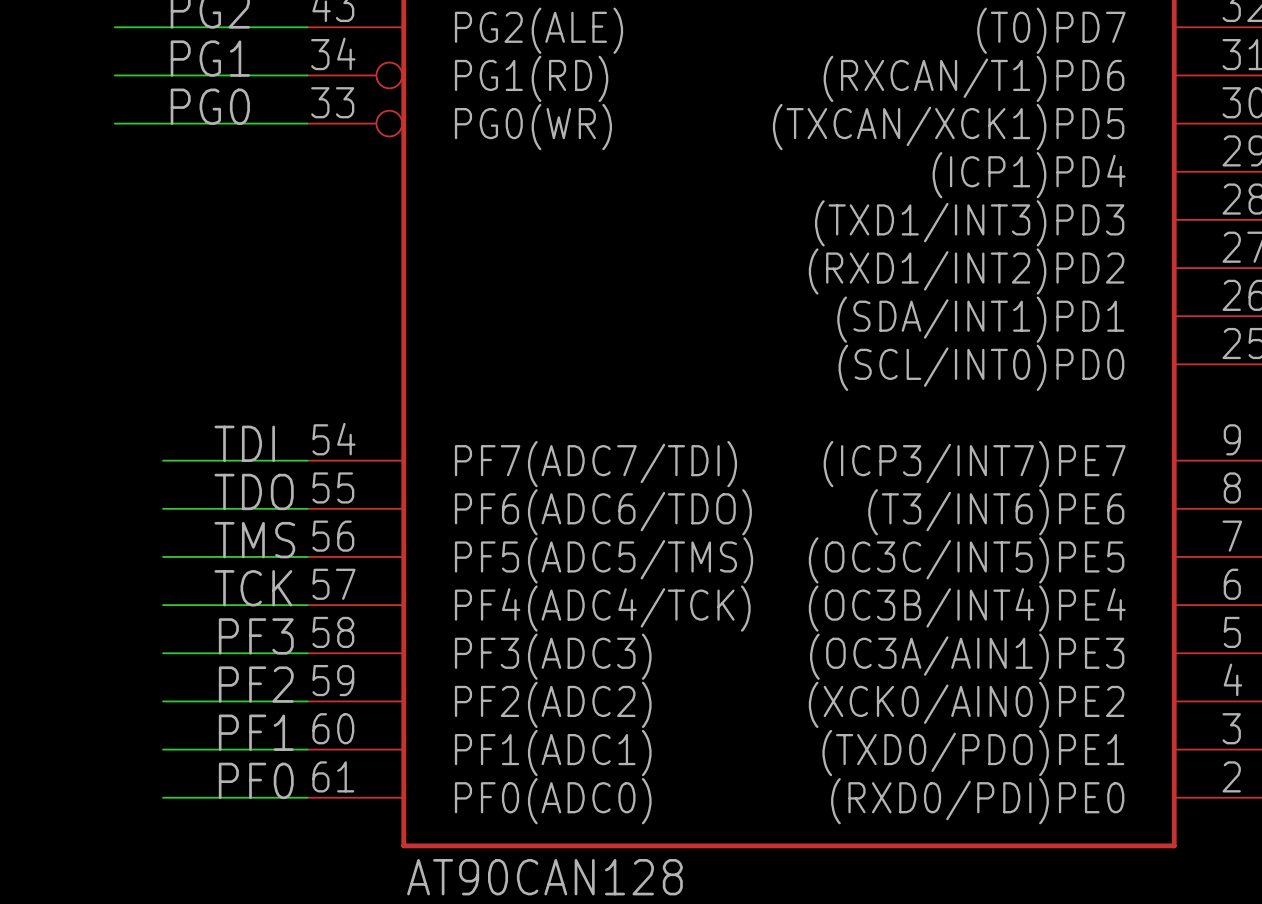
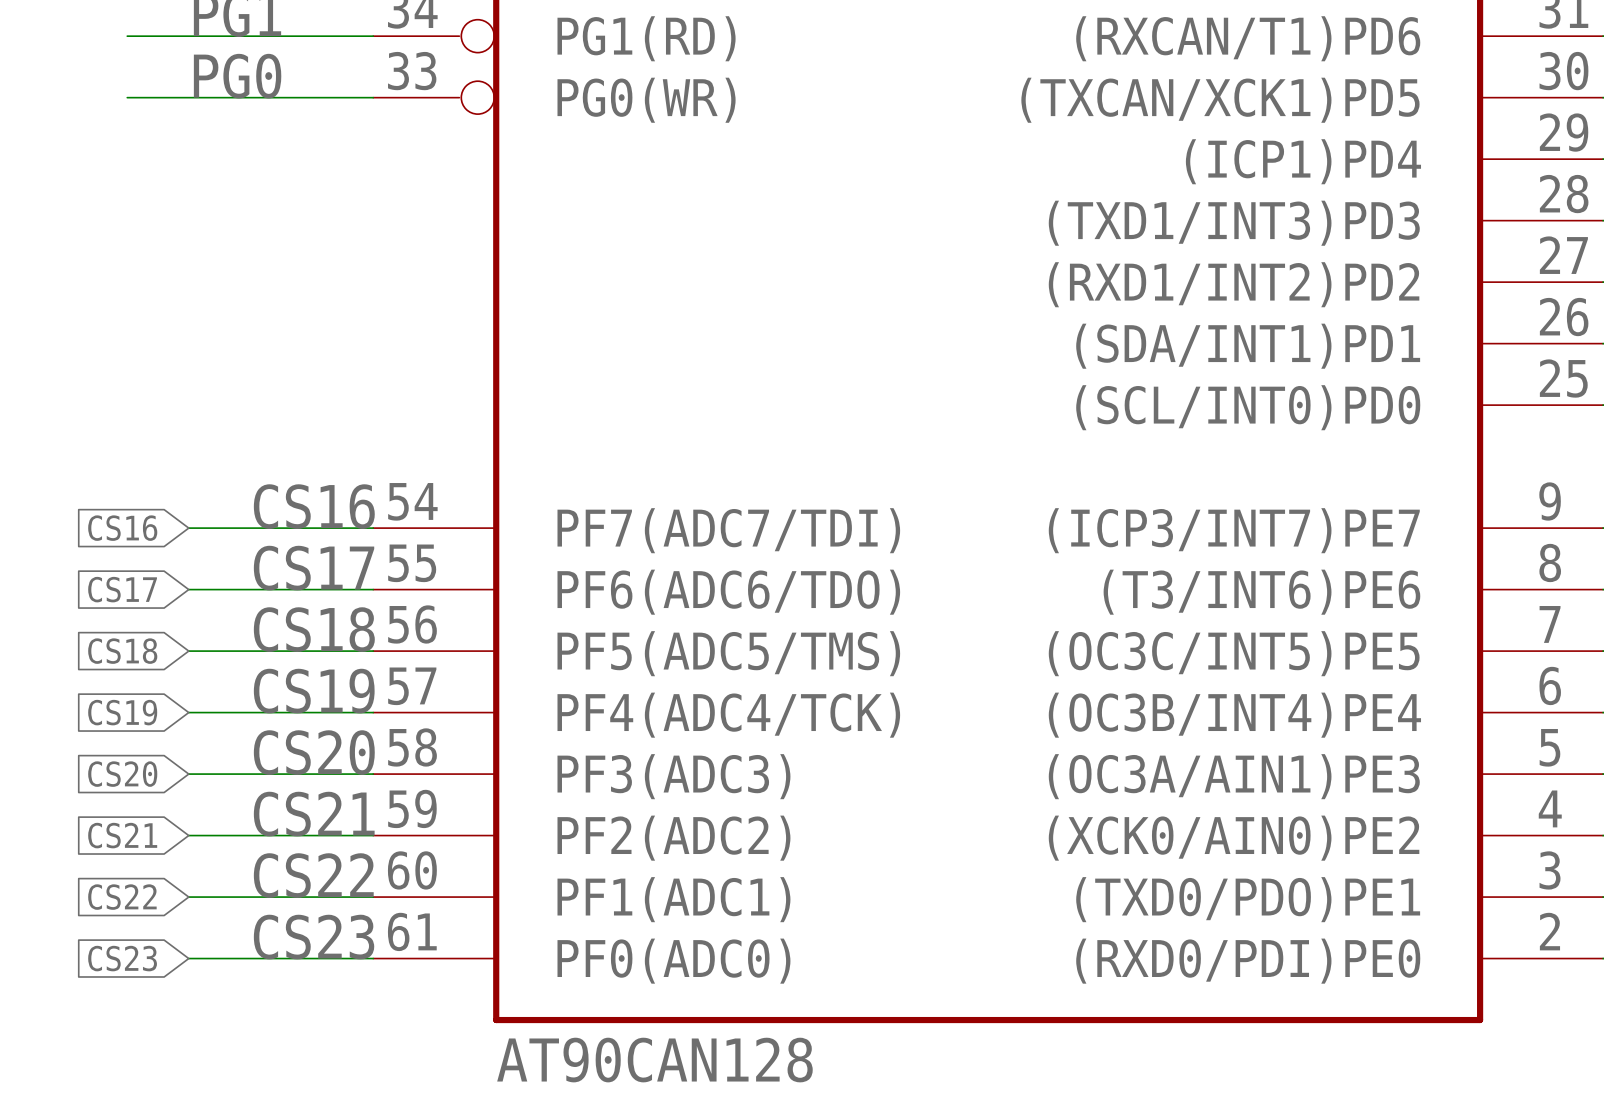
label: TDI (244, 443) -> CS16 (314, 506)
global label: none -> CS16 (122, 528)
label: TDO (254, 491) -> CS17 (314, 568)
global label: none -> CS17 (122, 589)
label: TMS (254, 540) -> CS18 (314, 629)
global label: none -> CS18 (122, 651)
label: TCK (253, 588) -> CS19 (314, 691)
global label: none -> CS19 (122, 712)
label: PF3 (256, 636) -> CS20 (314, 752)
global label: none -> CS20 (122, 774)
label: PF2 (256, 684) -> CS21 (314, 814)
global label: none -> CS21 (122, 835)
label: PF1 (256, 732) -> CS22 (313, 875)
global label: none -> CS22 (122, 897)
label: PF0 (256, 780) -> CS23 (314, 937)
global label: none -> CS23 (122, 958)

